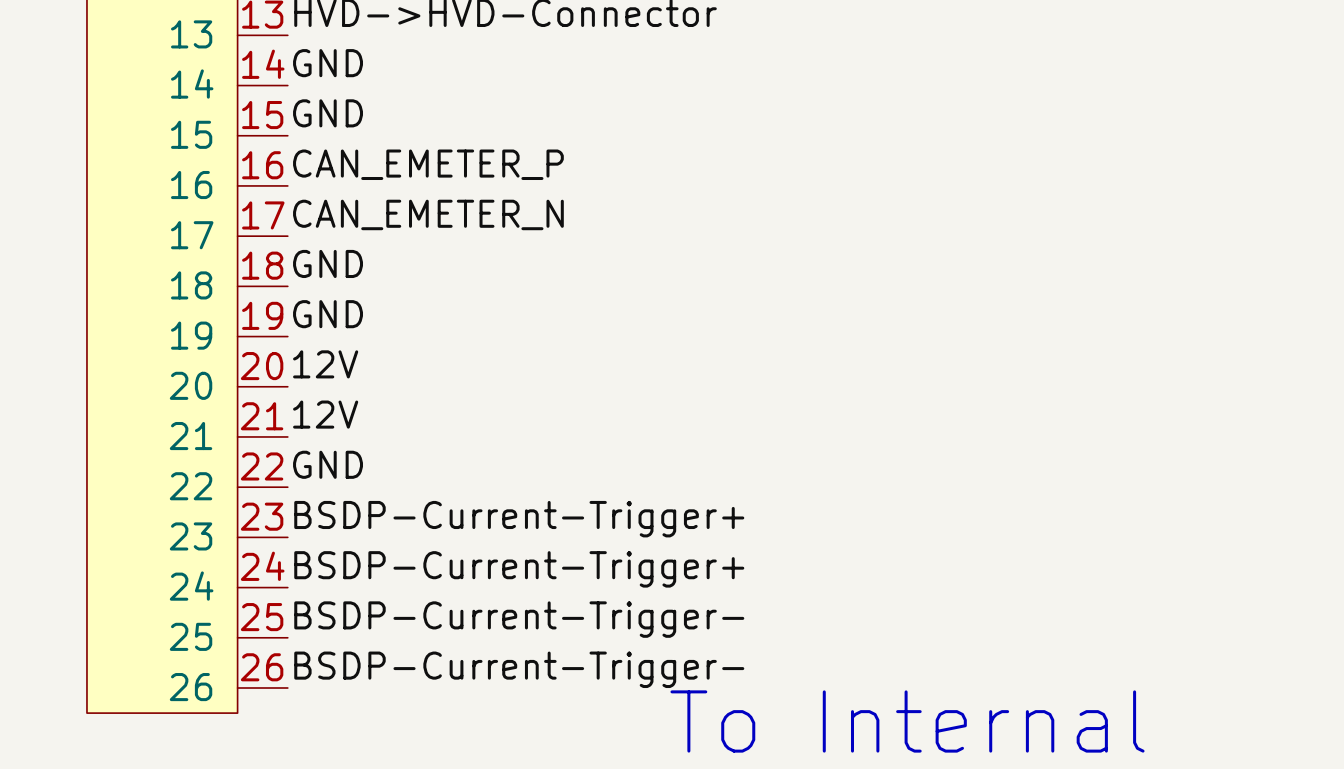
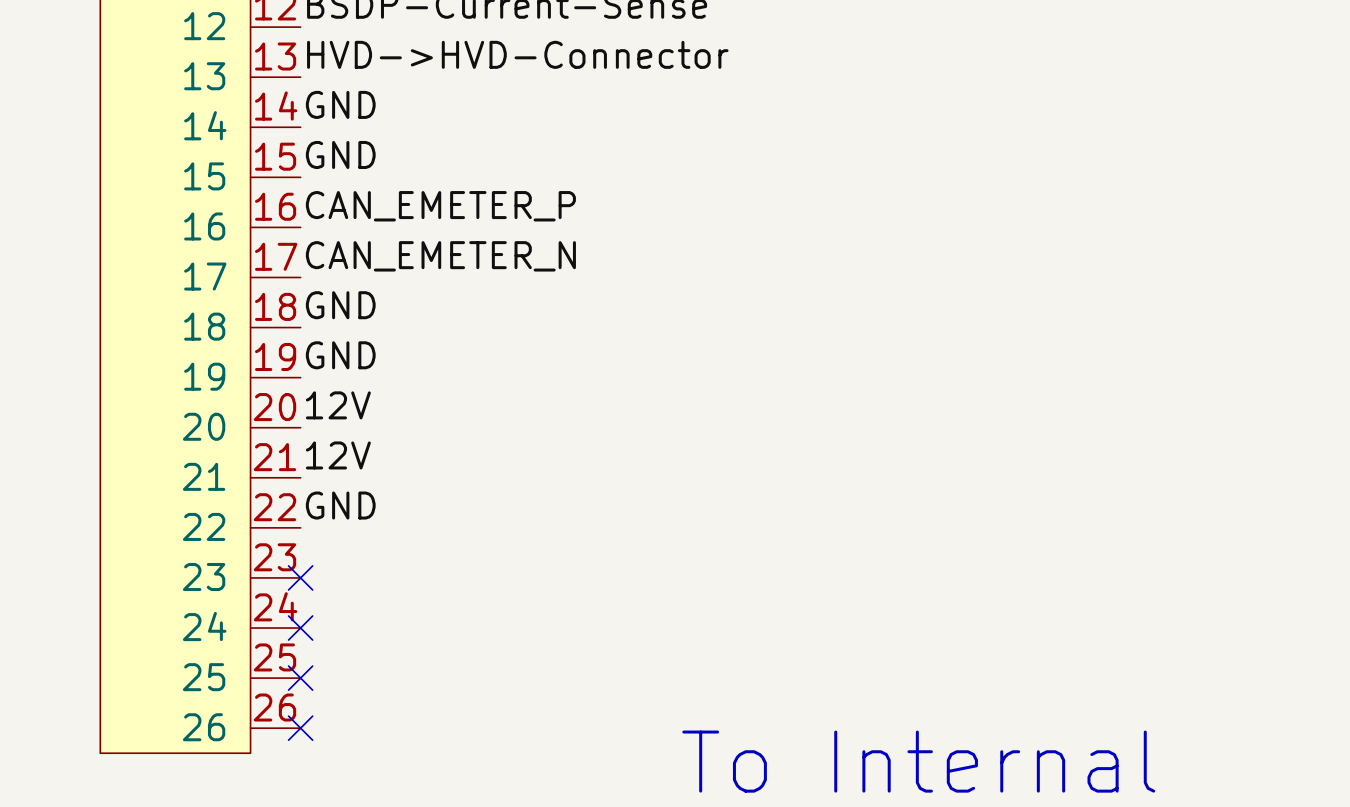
label: BSDP-Current-Trigger+ (519, 519) -> none
no-connect mark: none -> (300, 577)
label: BSDP-Current-Trigger+ (519, 569) -> none
no-connect mark: none -> (300, 628)
label: BSDP-Current-Trigger- (519, 619) -> none
no-connect mark: none -> (300, 678)
label: BSDP-Current-Trigger- (519, 669) -> none
no-connect mark: none -> (300, 728)

